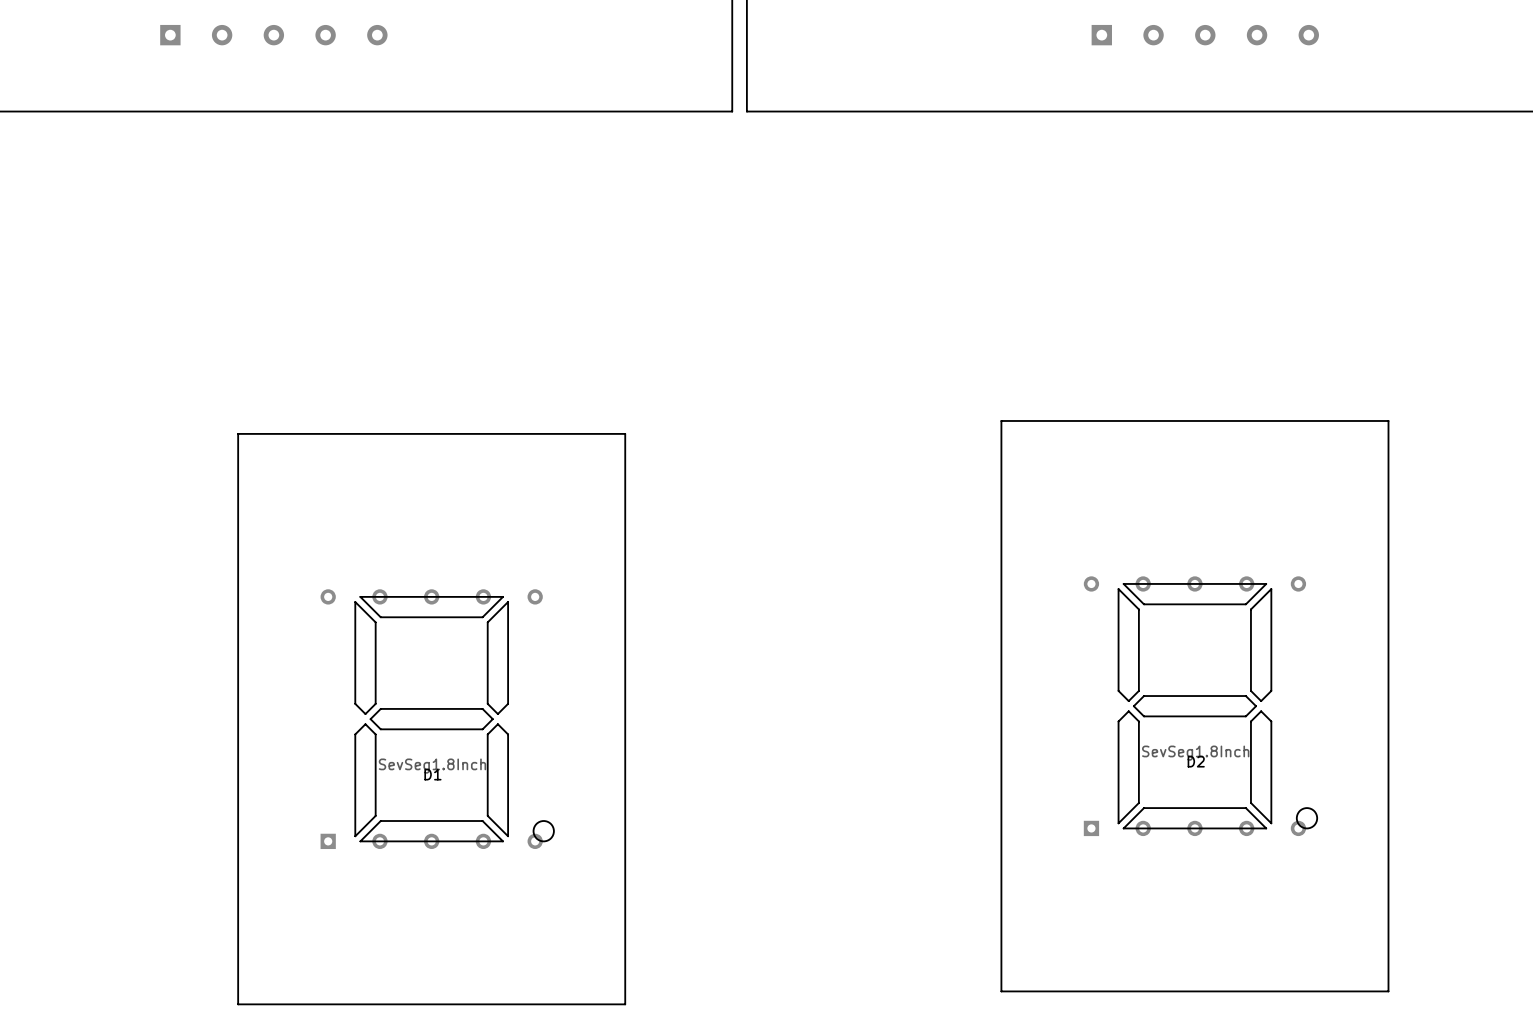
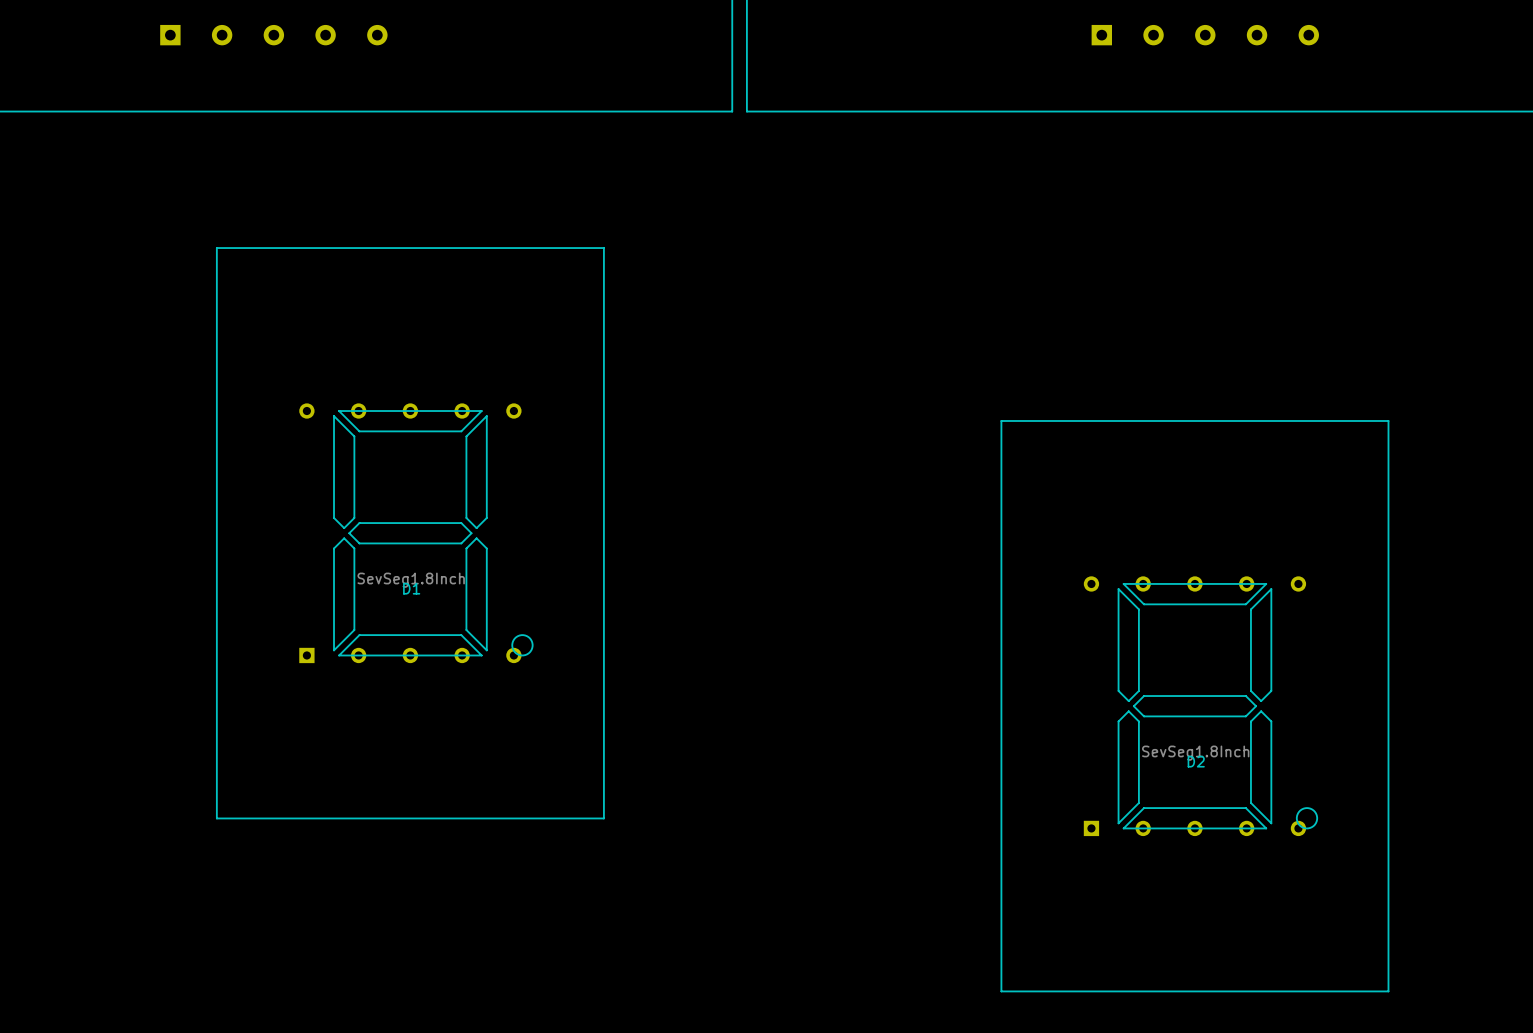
D1 position: (431, 719) -> (410, 533)

